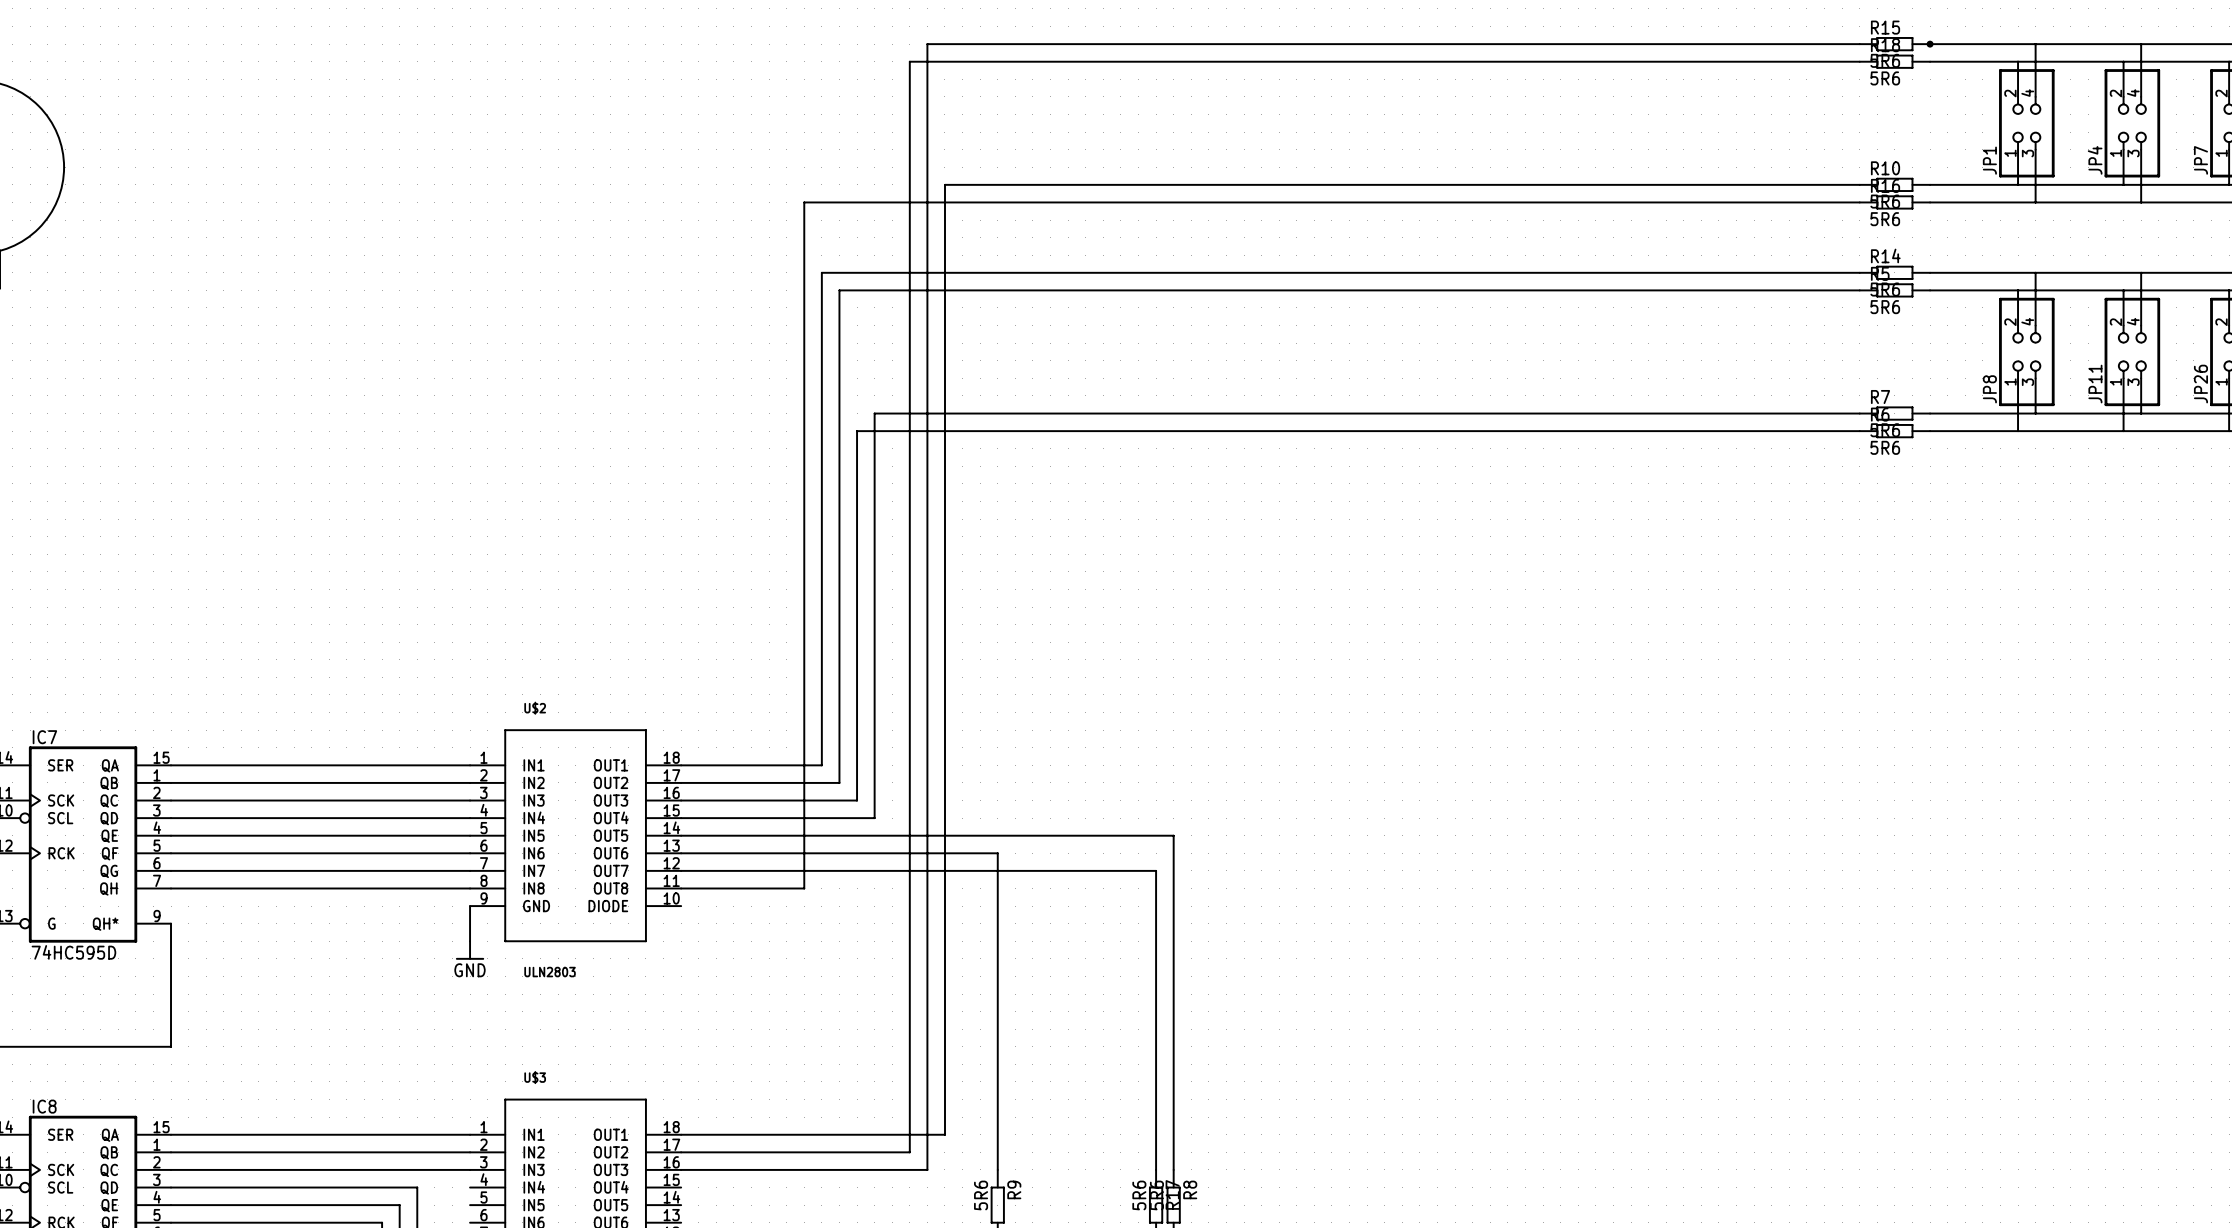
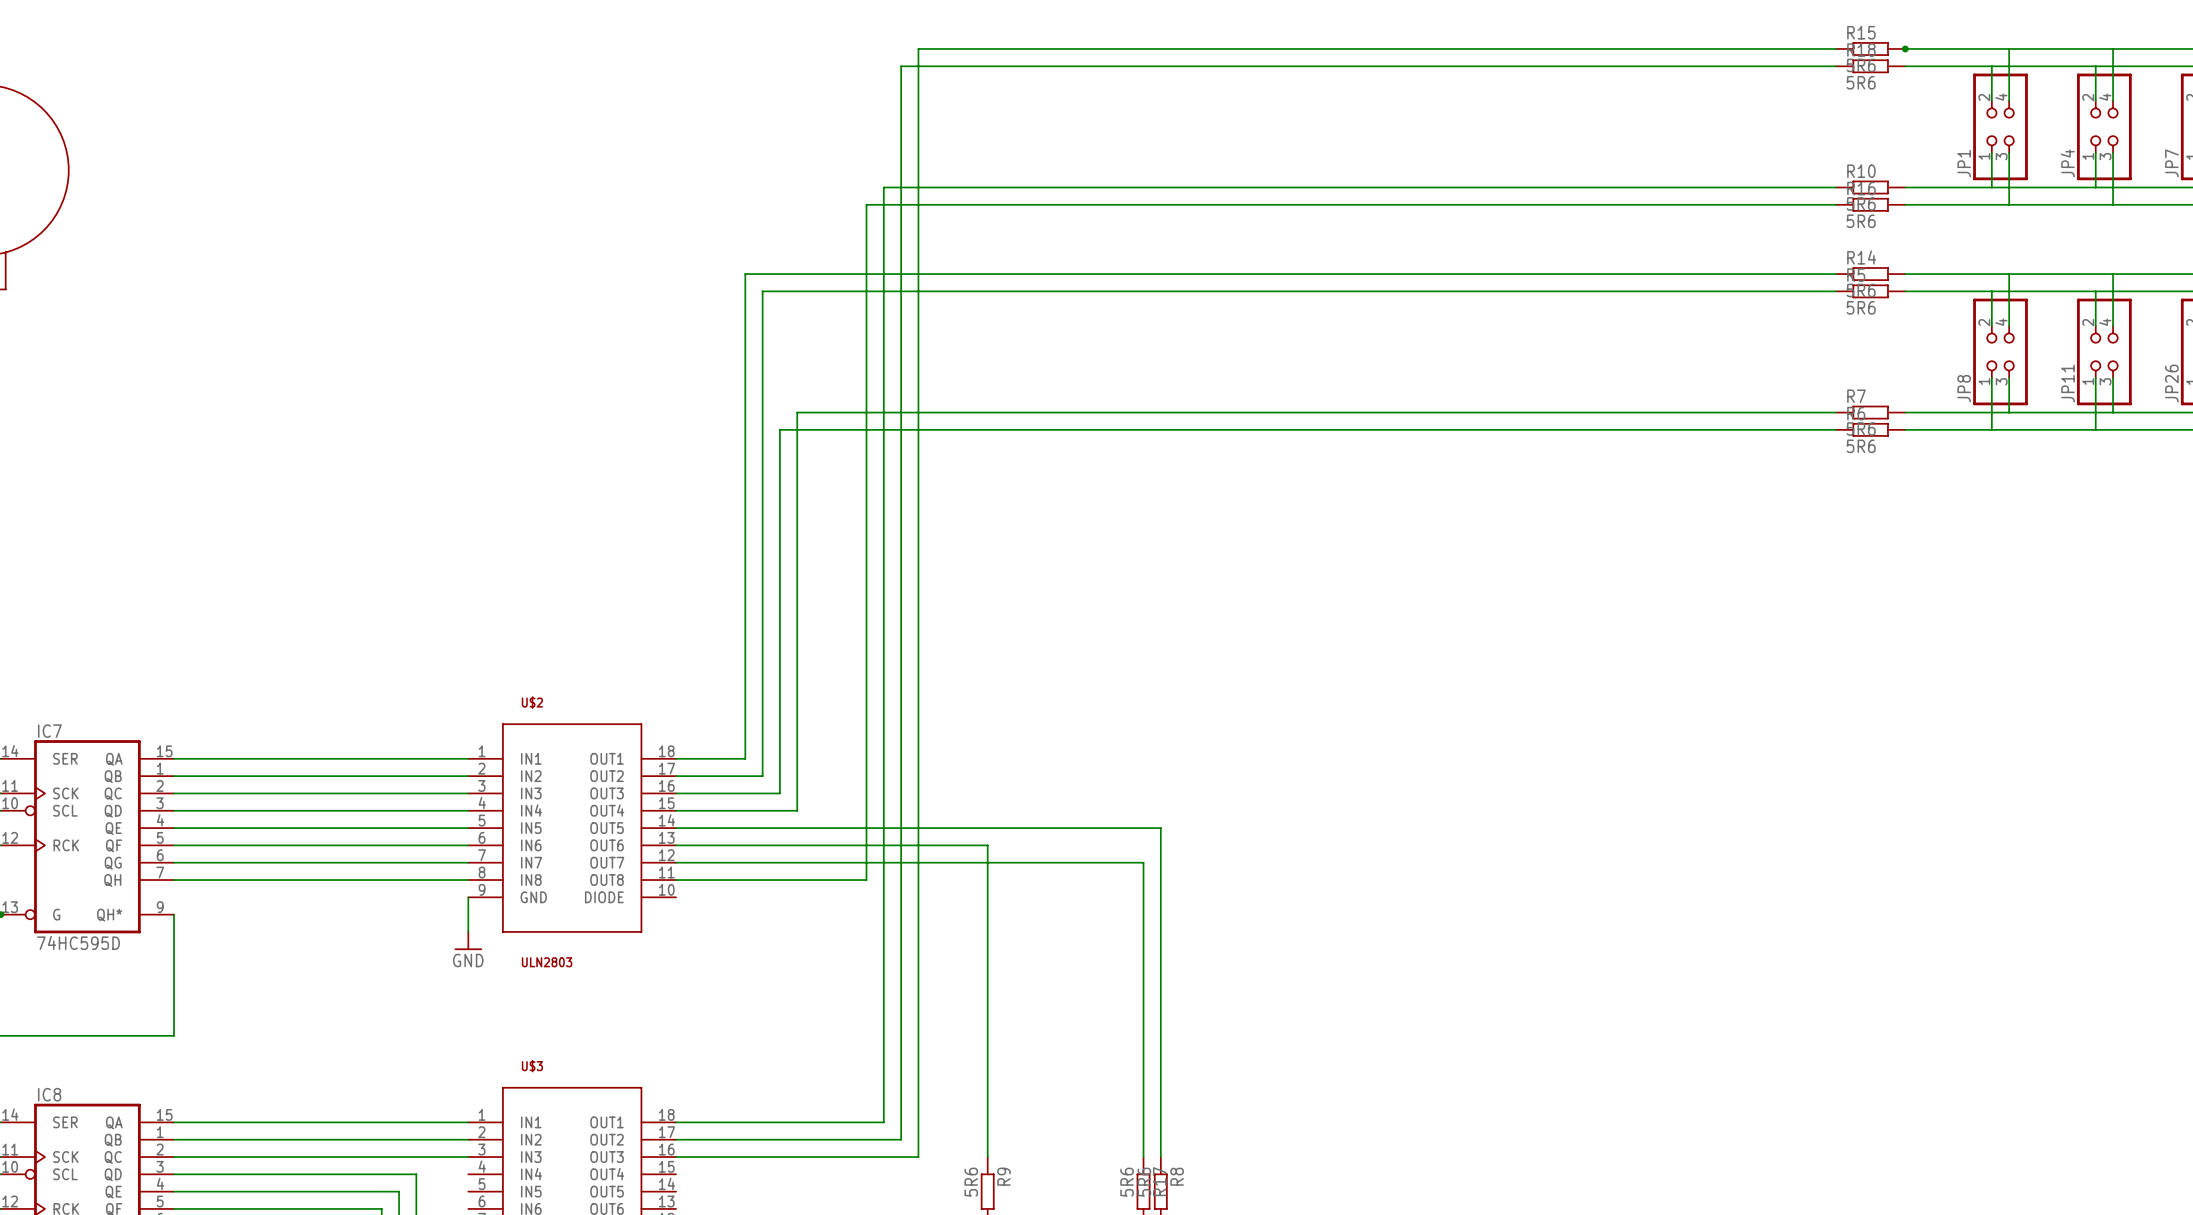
wire: (944, 184) (944, 1134) (892, 1134) -> (935, 187) (883, 187) (883, 1122)
wire: (874, 202) (804, 202) (804, 413) -> (866, 204) (866, 412) (797, 412)
wire: (821, 272) (821, 765) (751, 765) -> (814, 274) (745, 274) (745, 758)
wire: (839, 290) (839, 782) (769, 782) -> (831, 291) (762, 291) (762, 776)
wire: (857, 431) (857, 800) (786, 800) -> (849, 429) (779, 429) (779, 793)
wire: (874, 818) (804, 818) (804, 888) -> (866, 810) (866, 880) (797, 880)

